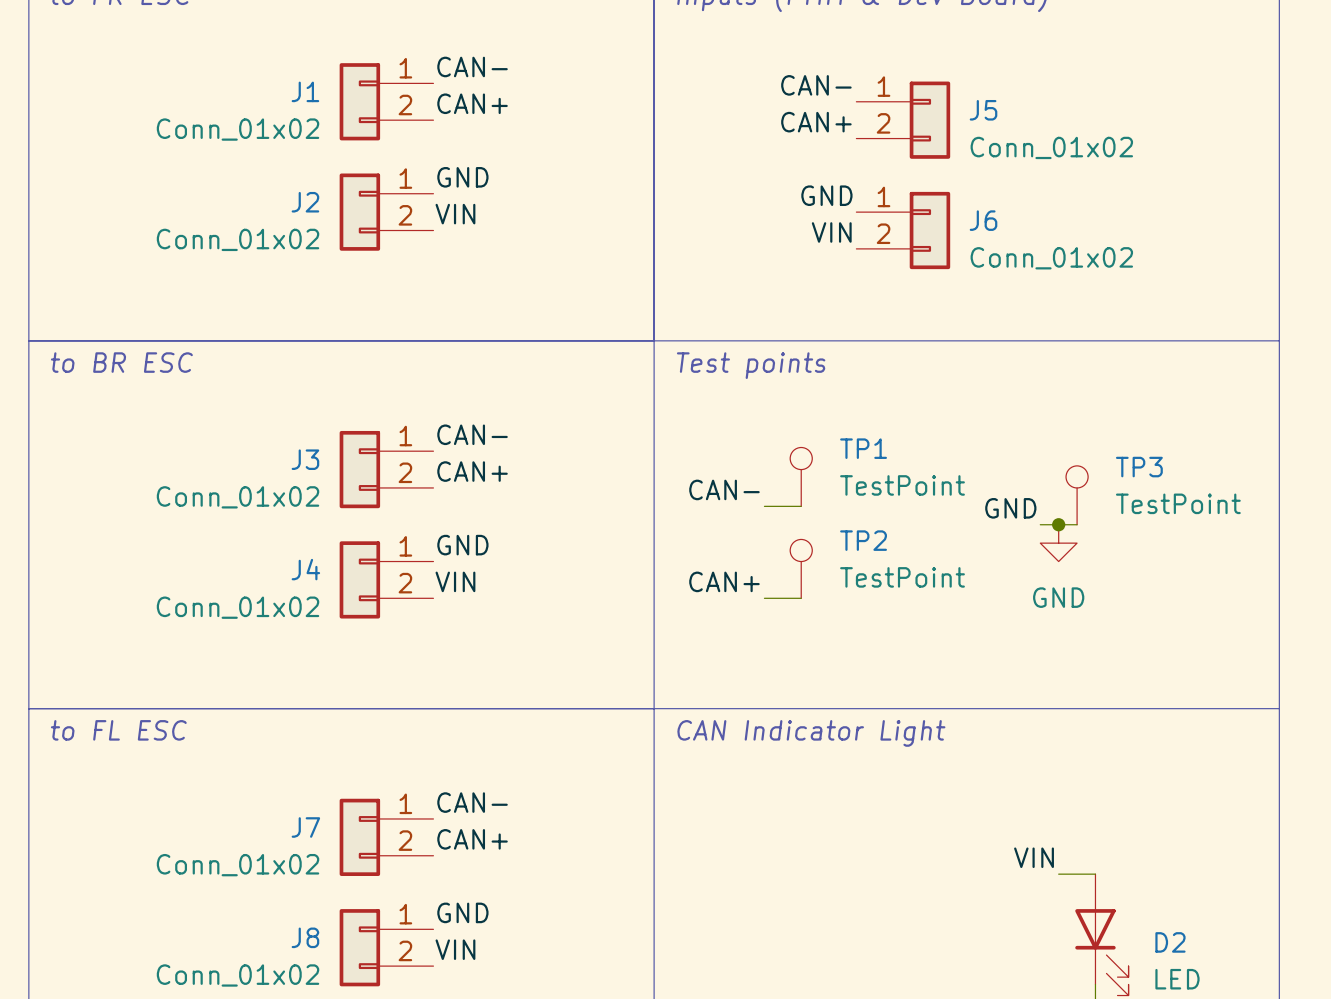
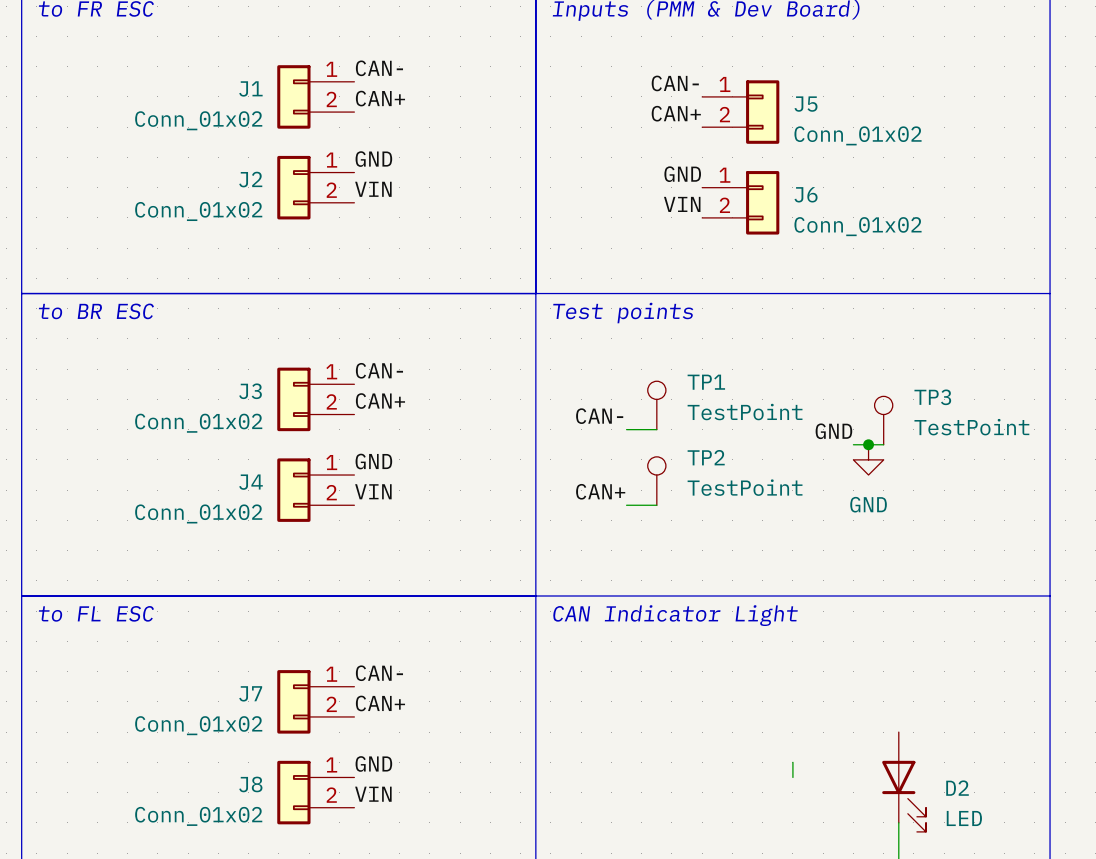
label: VIN (1034, 857) -> none
wire: (1058, 874) (1095, 874) -> none
wire: none -> (792, 762) (792, 777)

